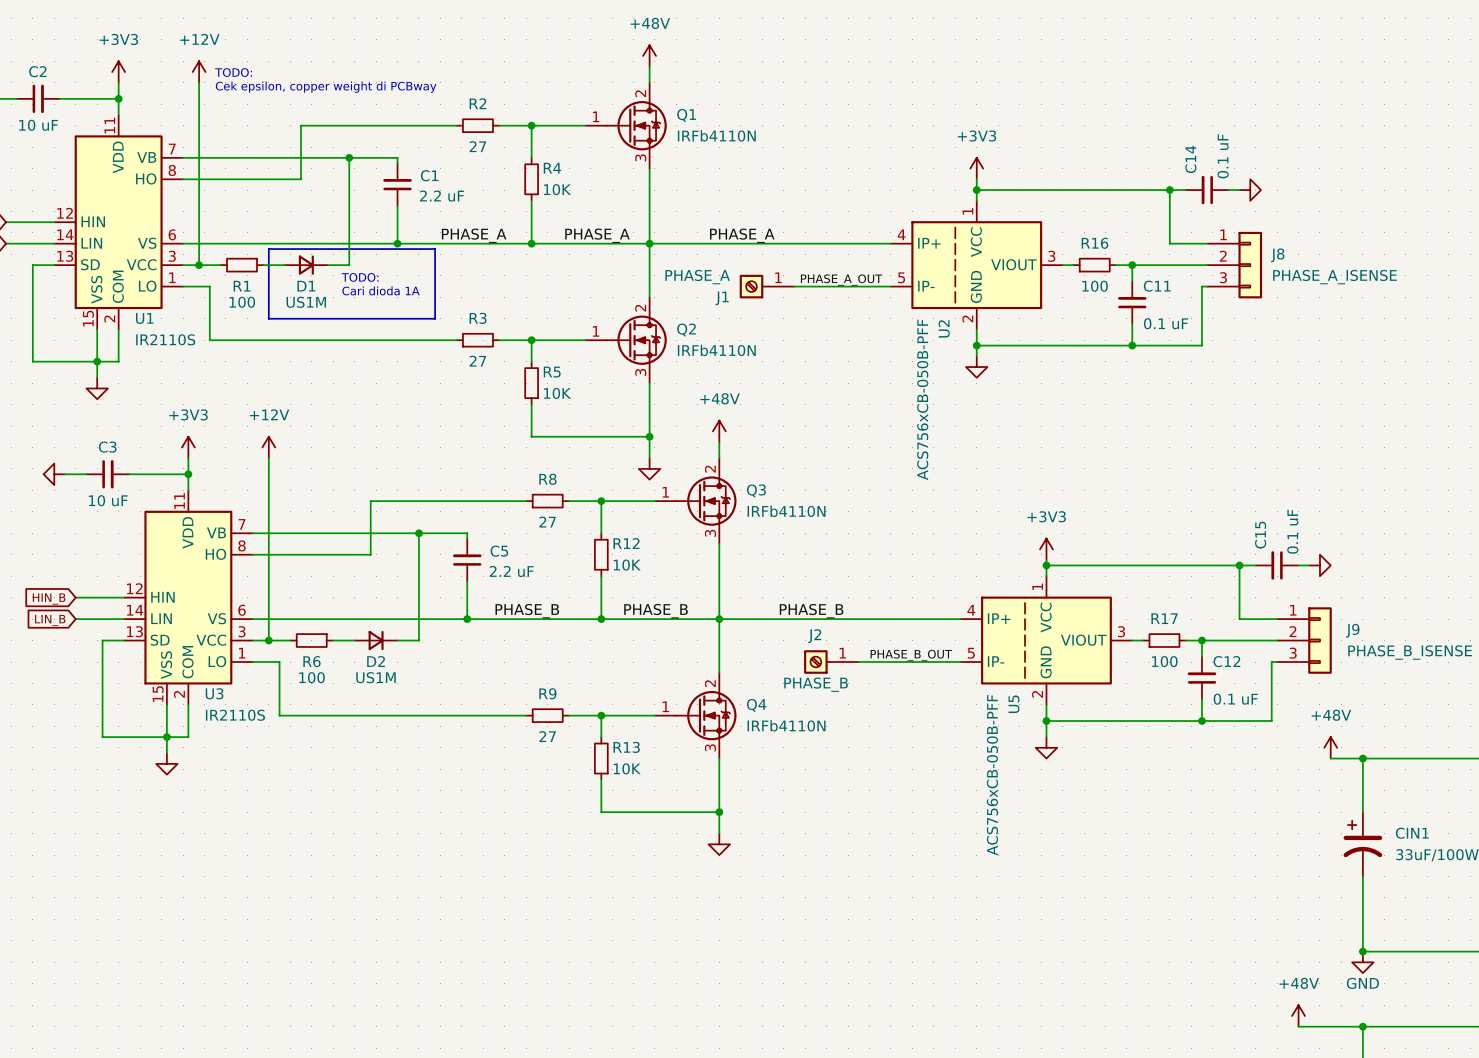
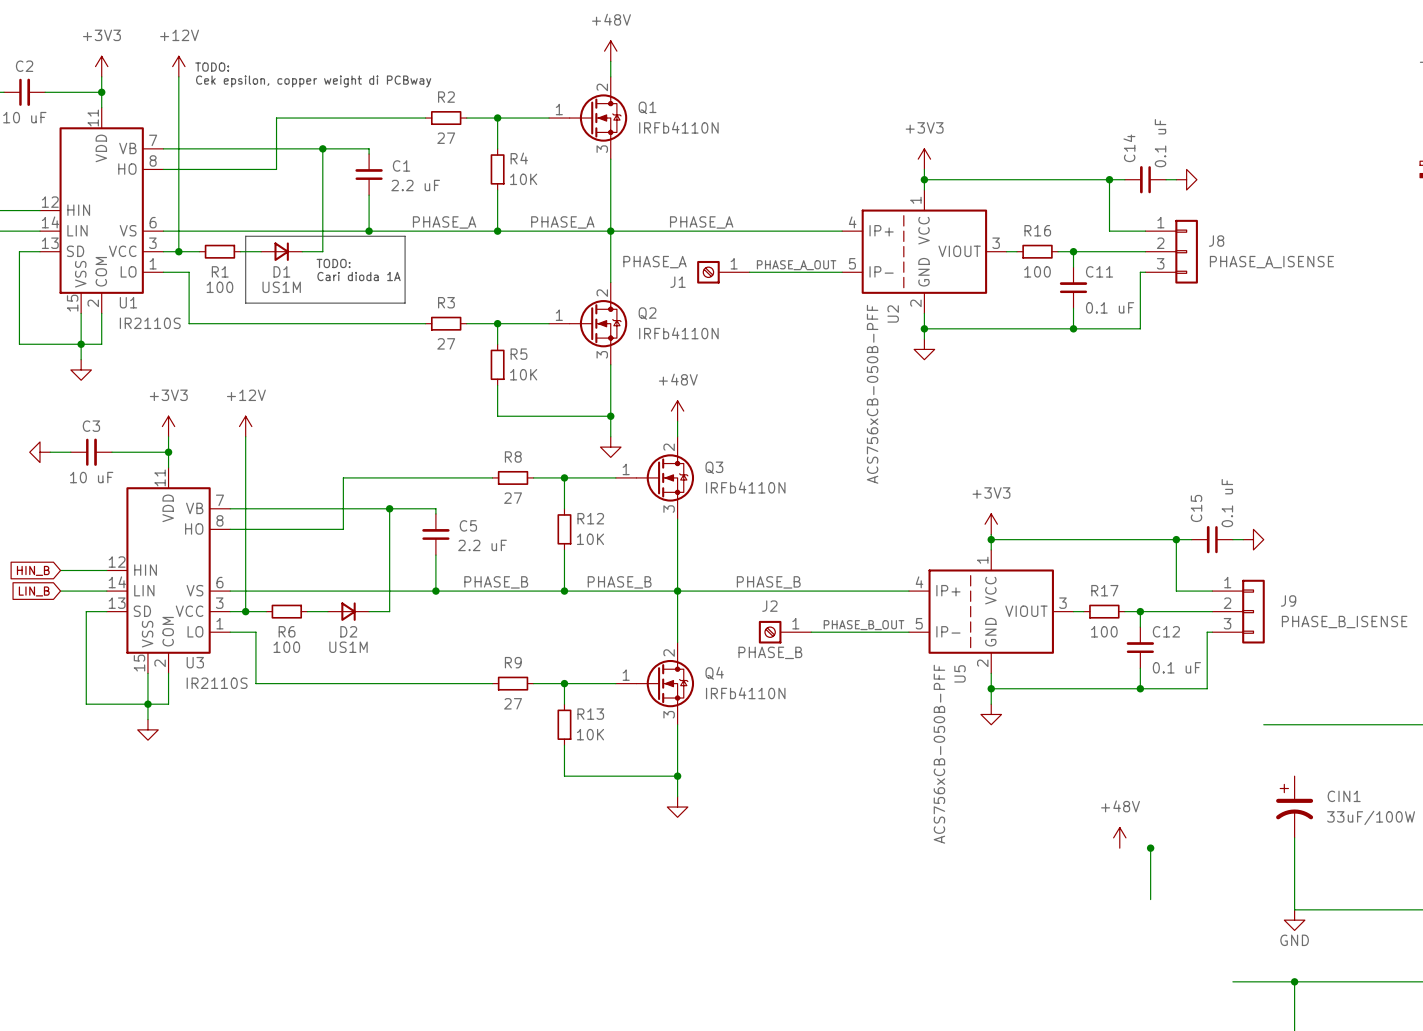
power symbol: +48V (1330, 747) -> none
wire: (1362, 758) (1362, 812) -> (1150, 848) (1150, 899)
junction: (1362, 758) -> none
power symbol: none -> +48V (1119, 837)
junction: none -> (1150, 848)
junction: (1362, 951) -> none
power symbol: +48V (1298, 1015) -> none

